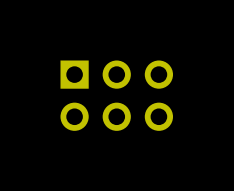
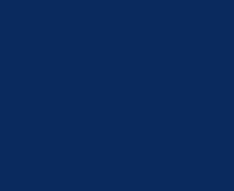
part: (116, 95) -> none

